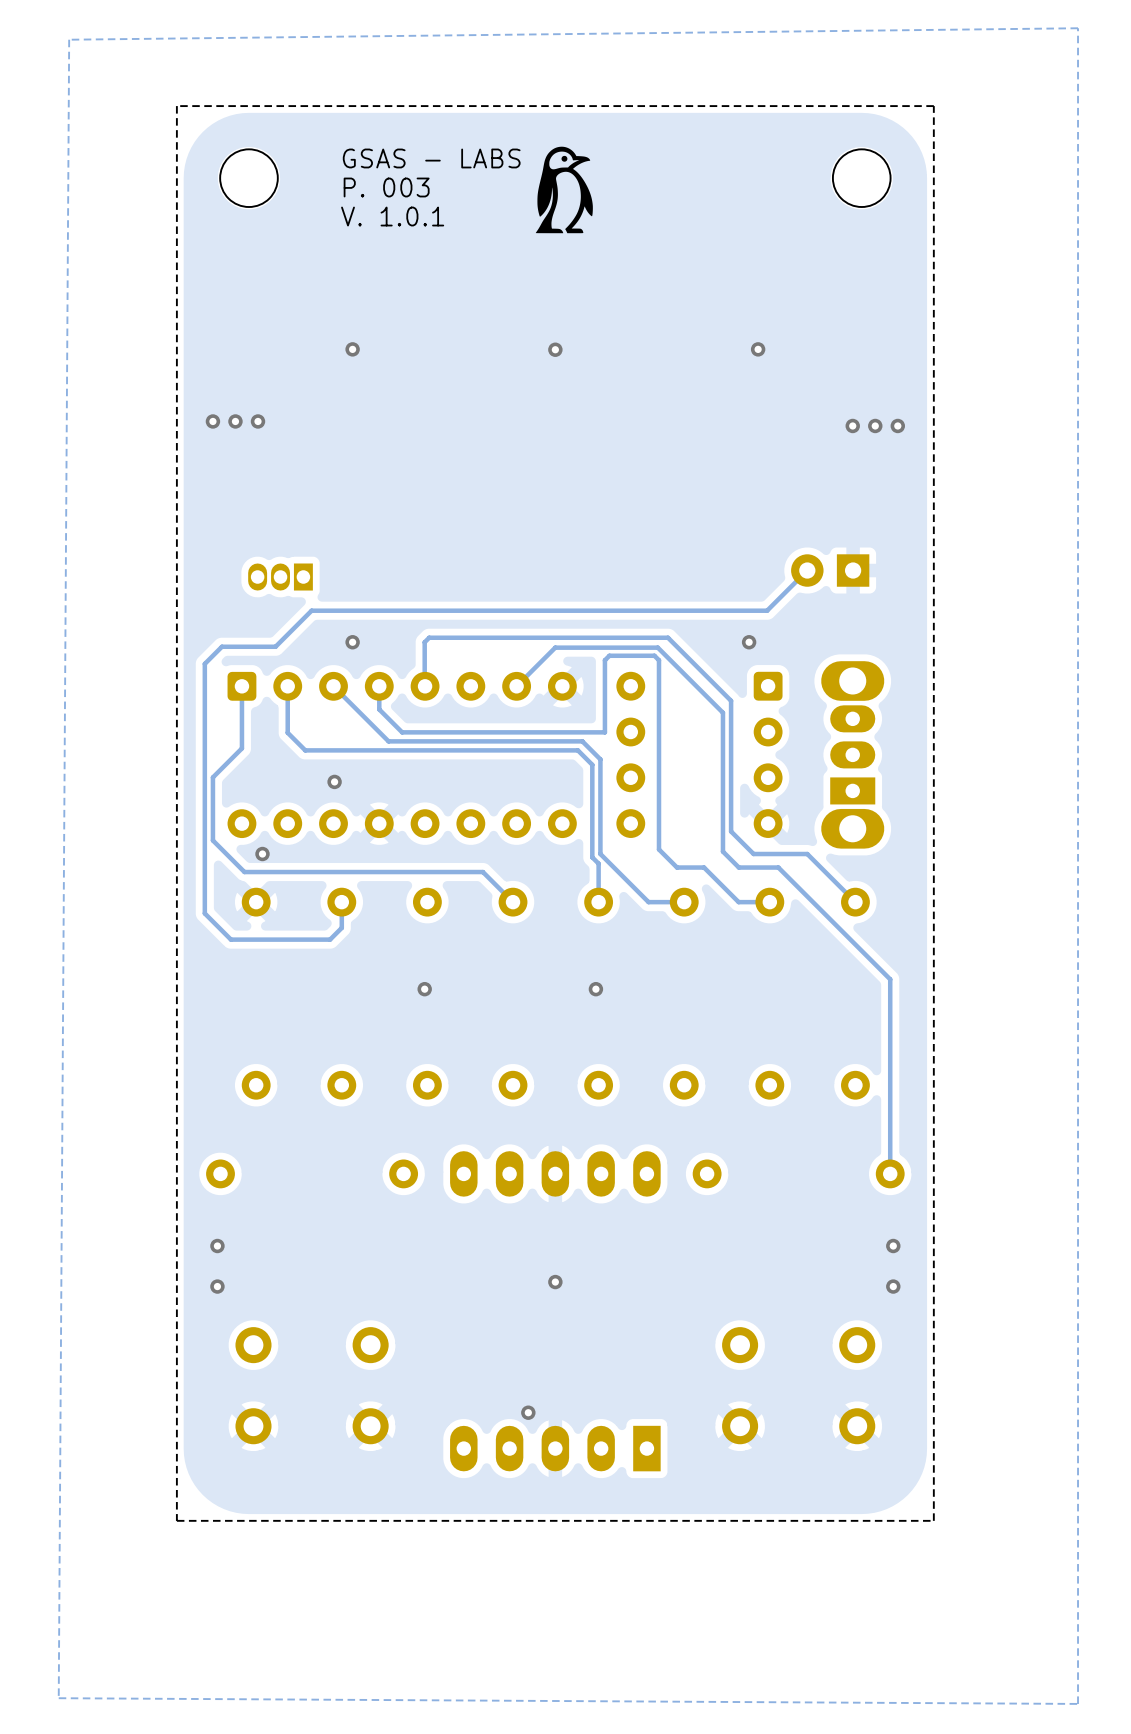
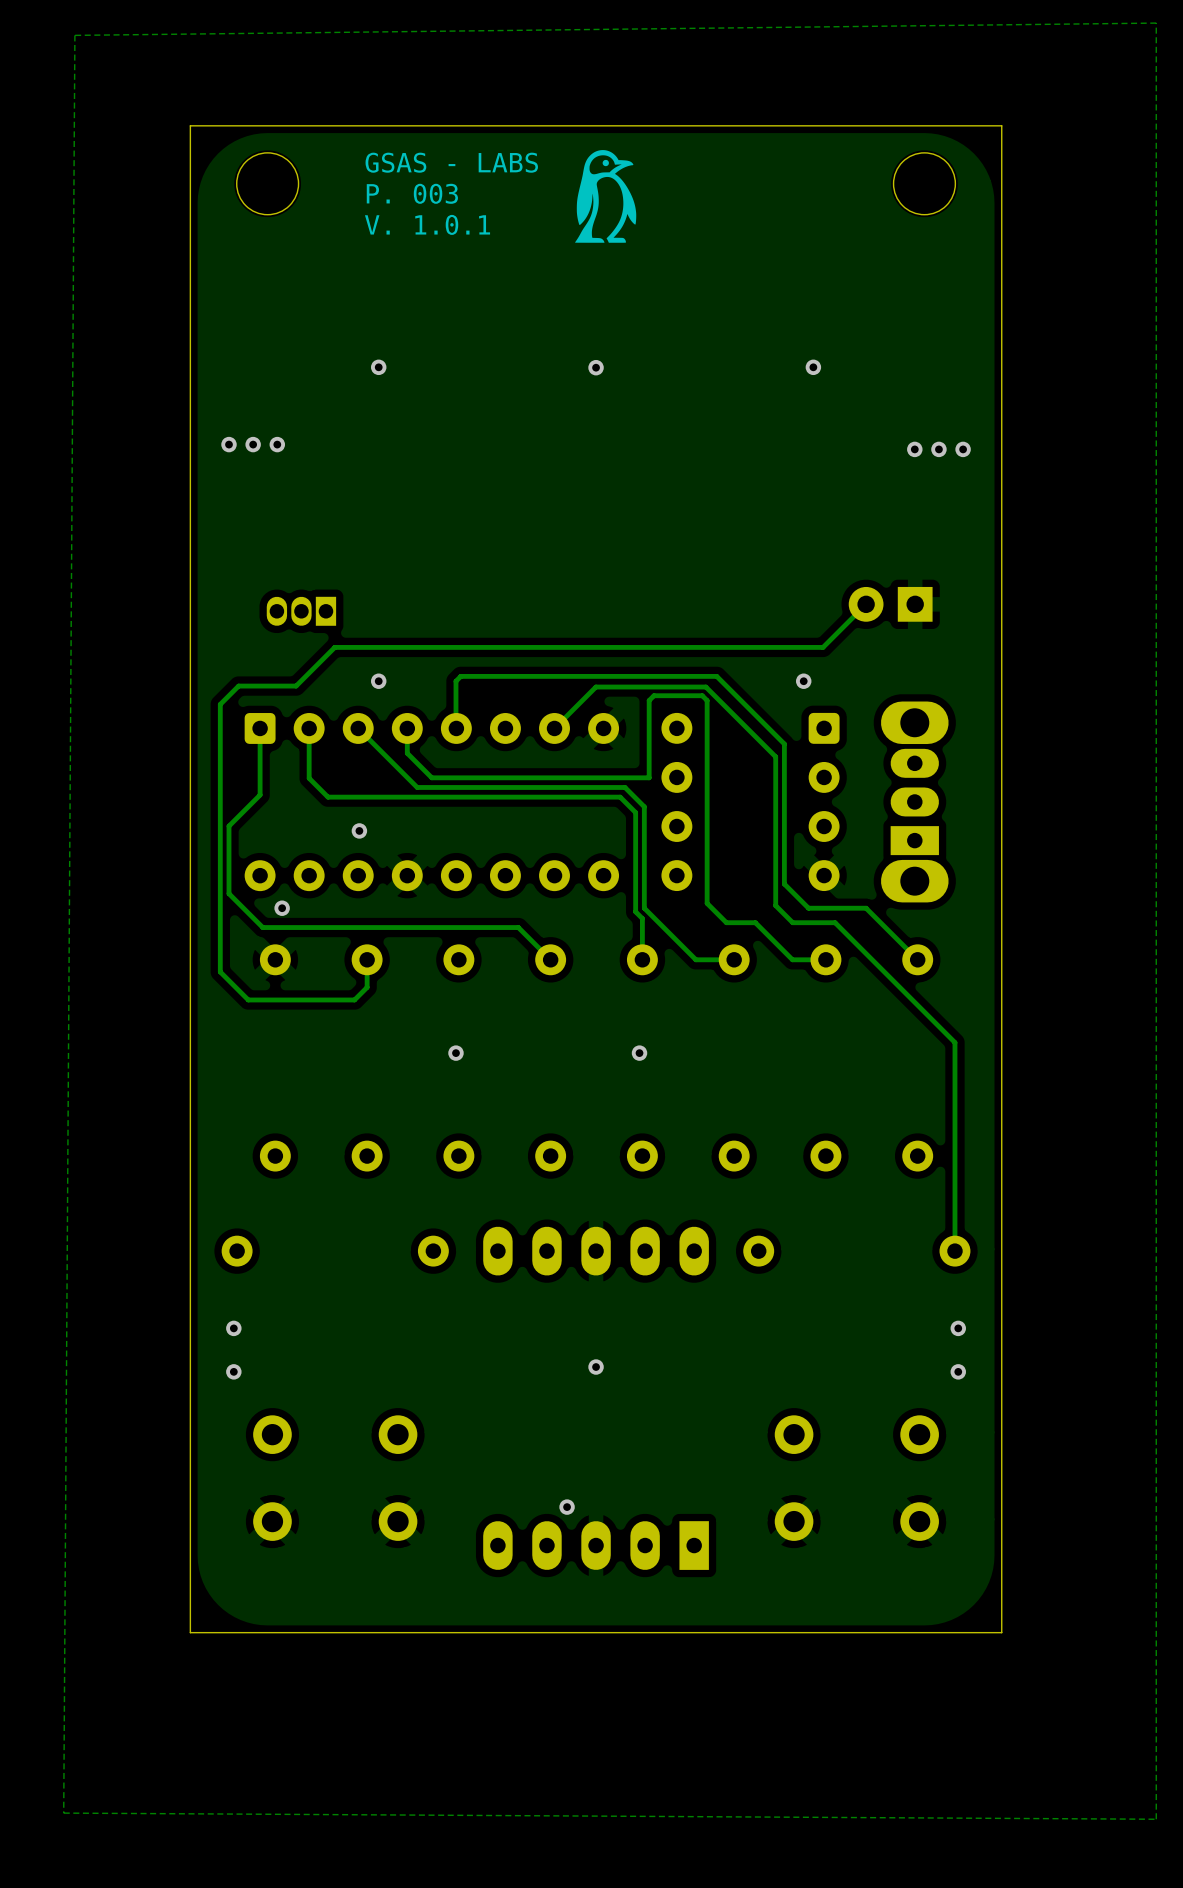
board edge: (933, 106) (176, 106) (176, 1520) (933, 1520) (933, 106) -> (1001, 125) (1001, 1632) (190, 1632) (190, 125) (1001, 125)

